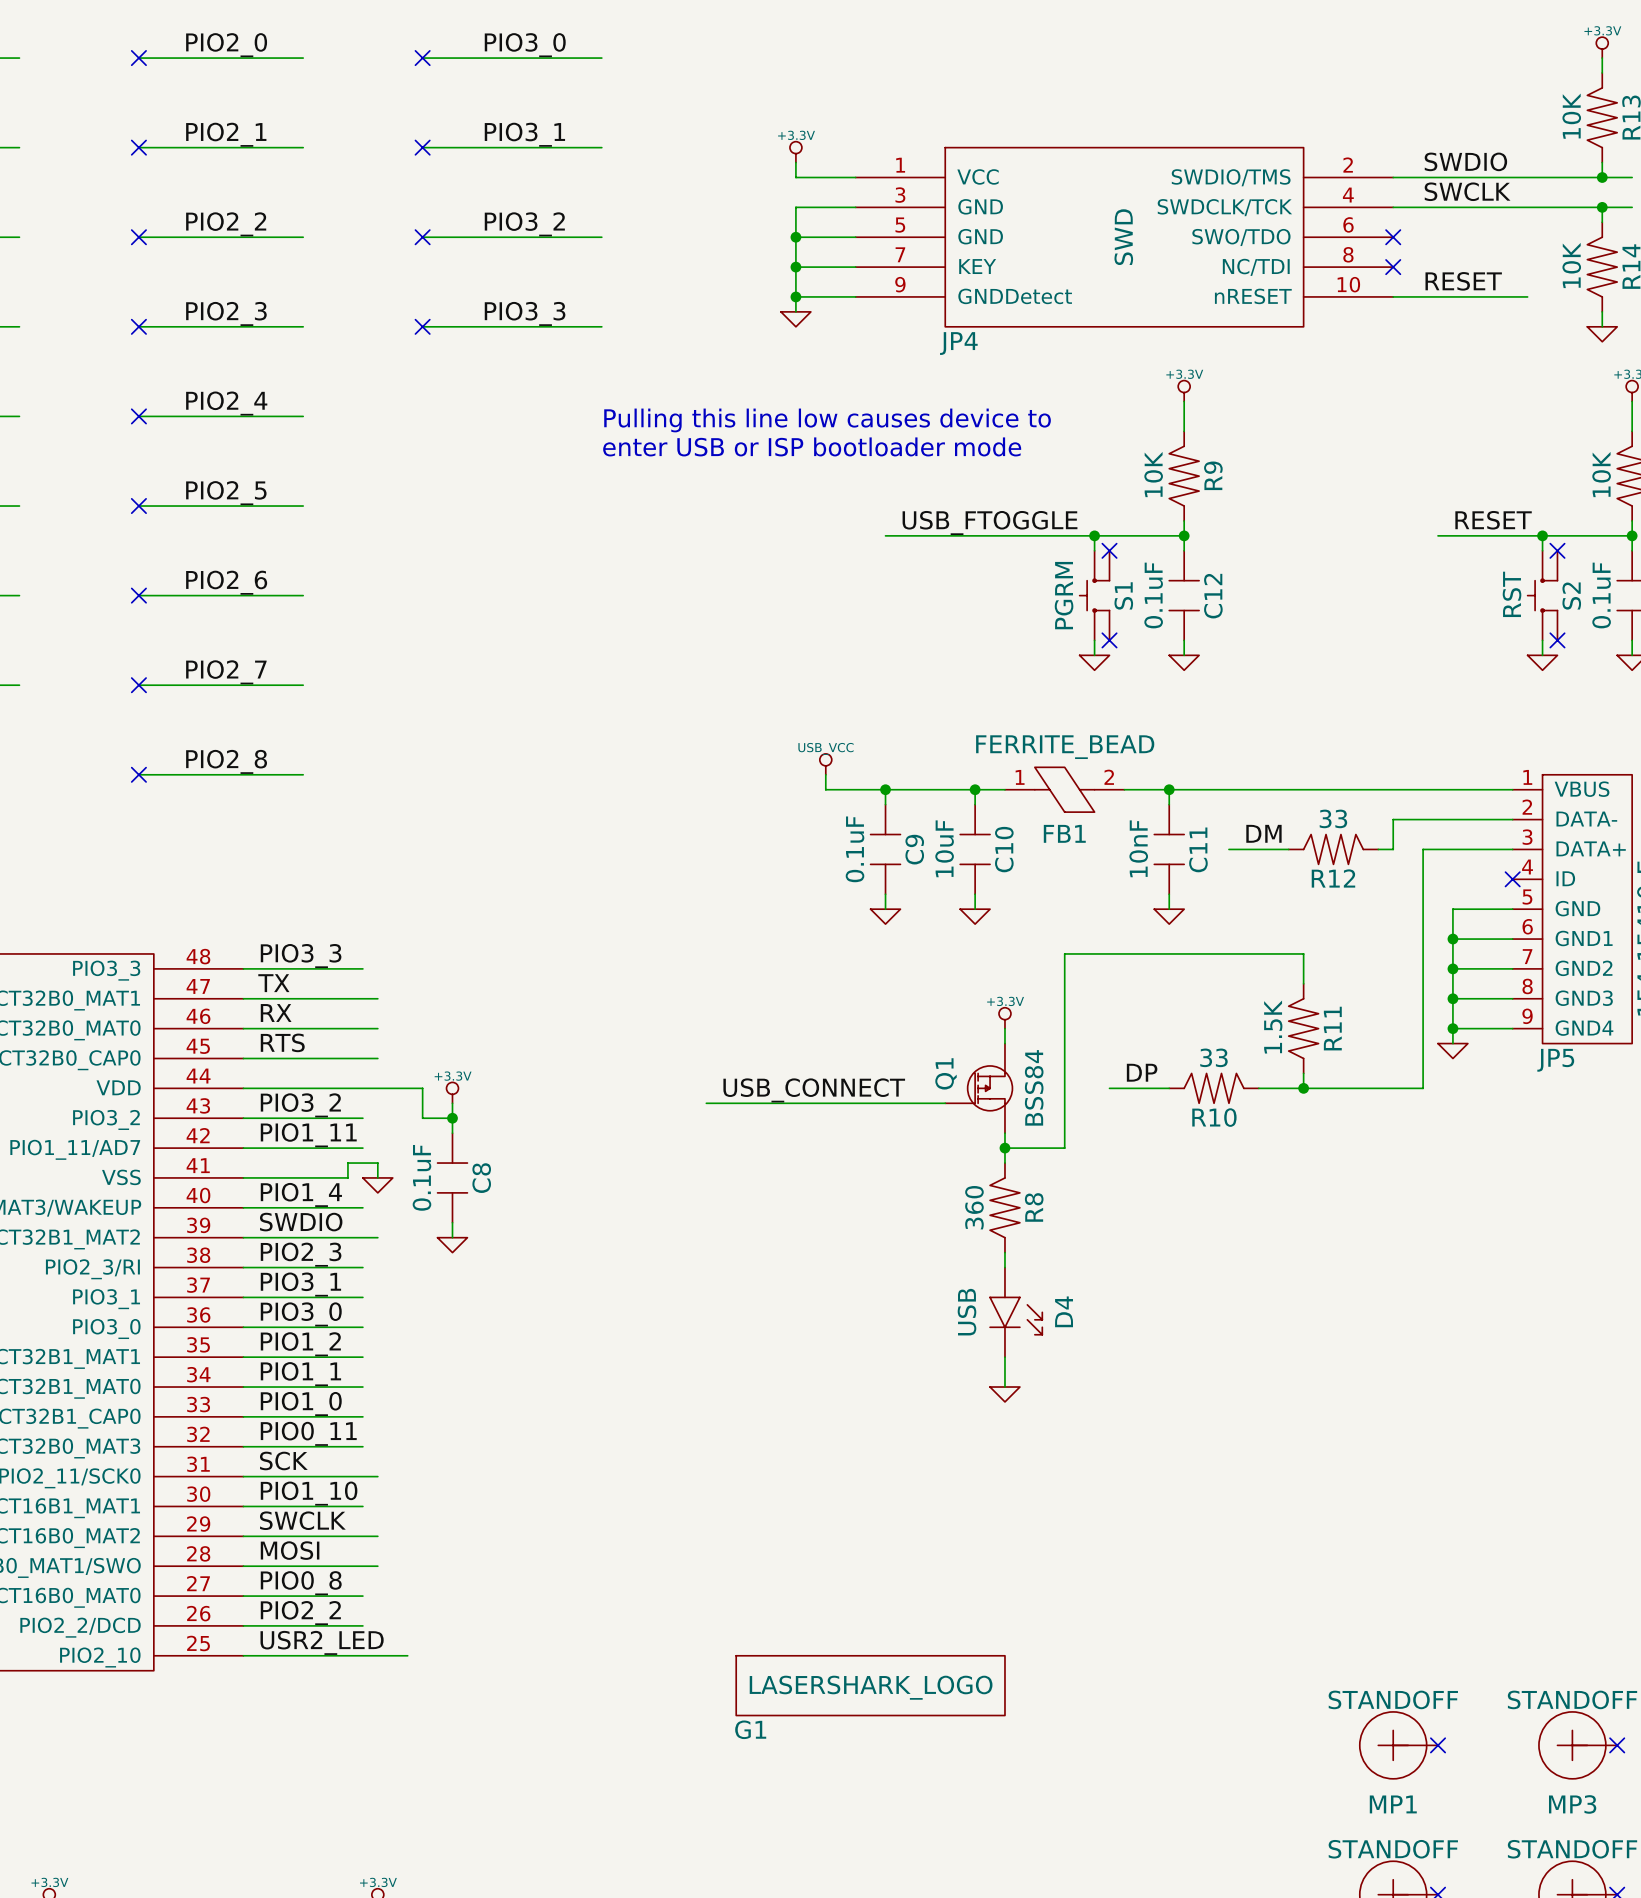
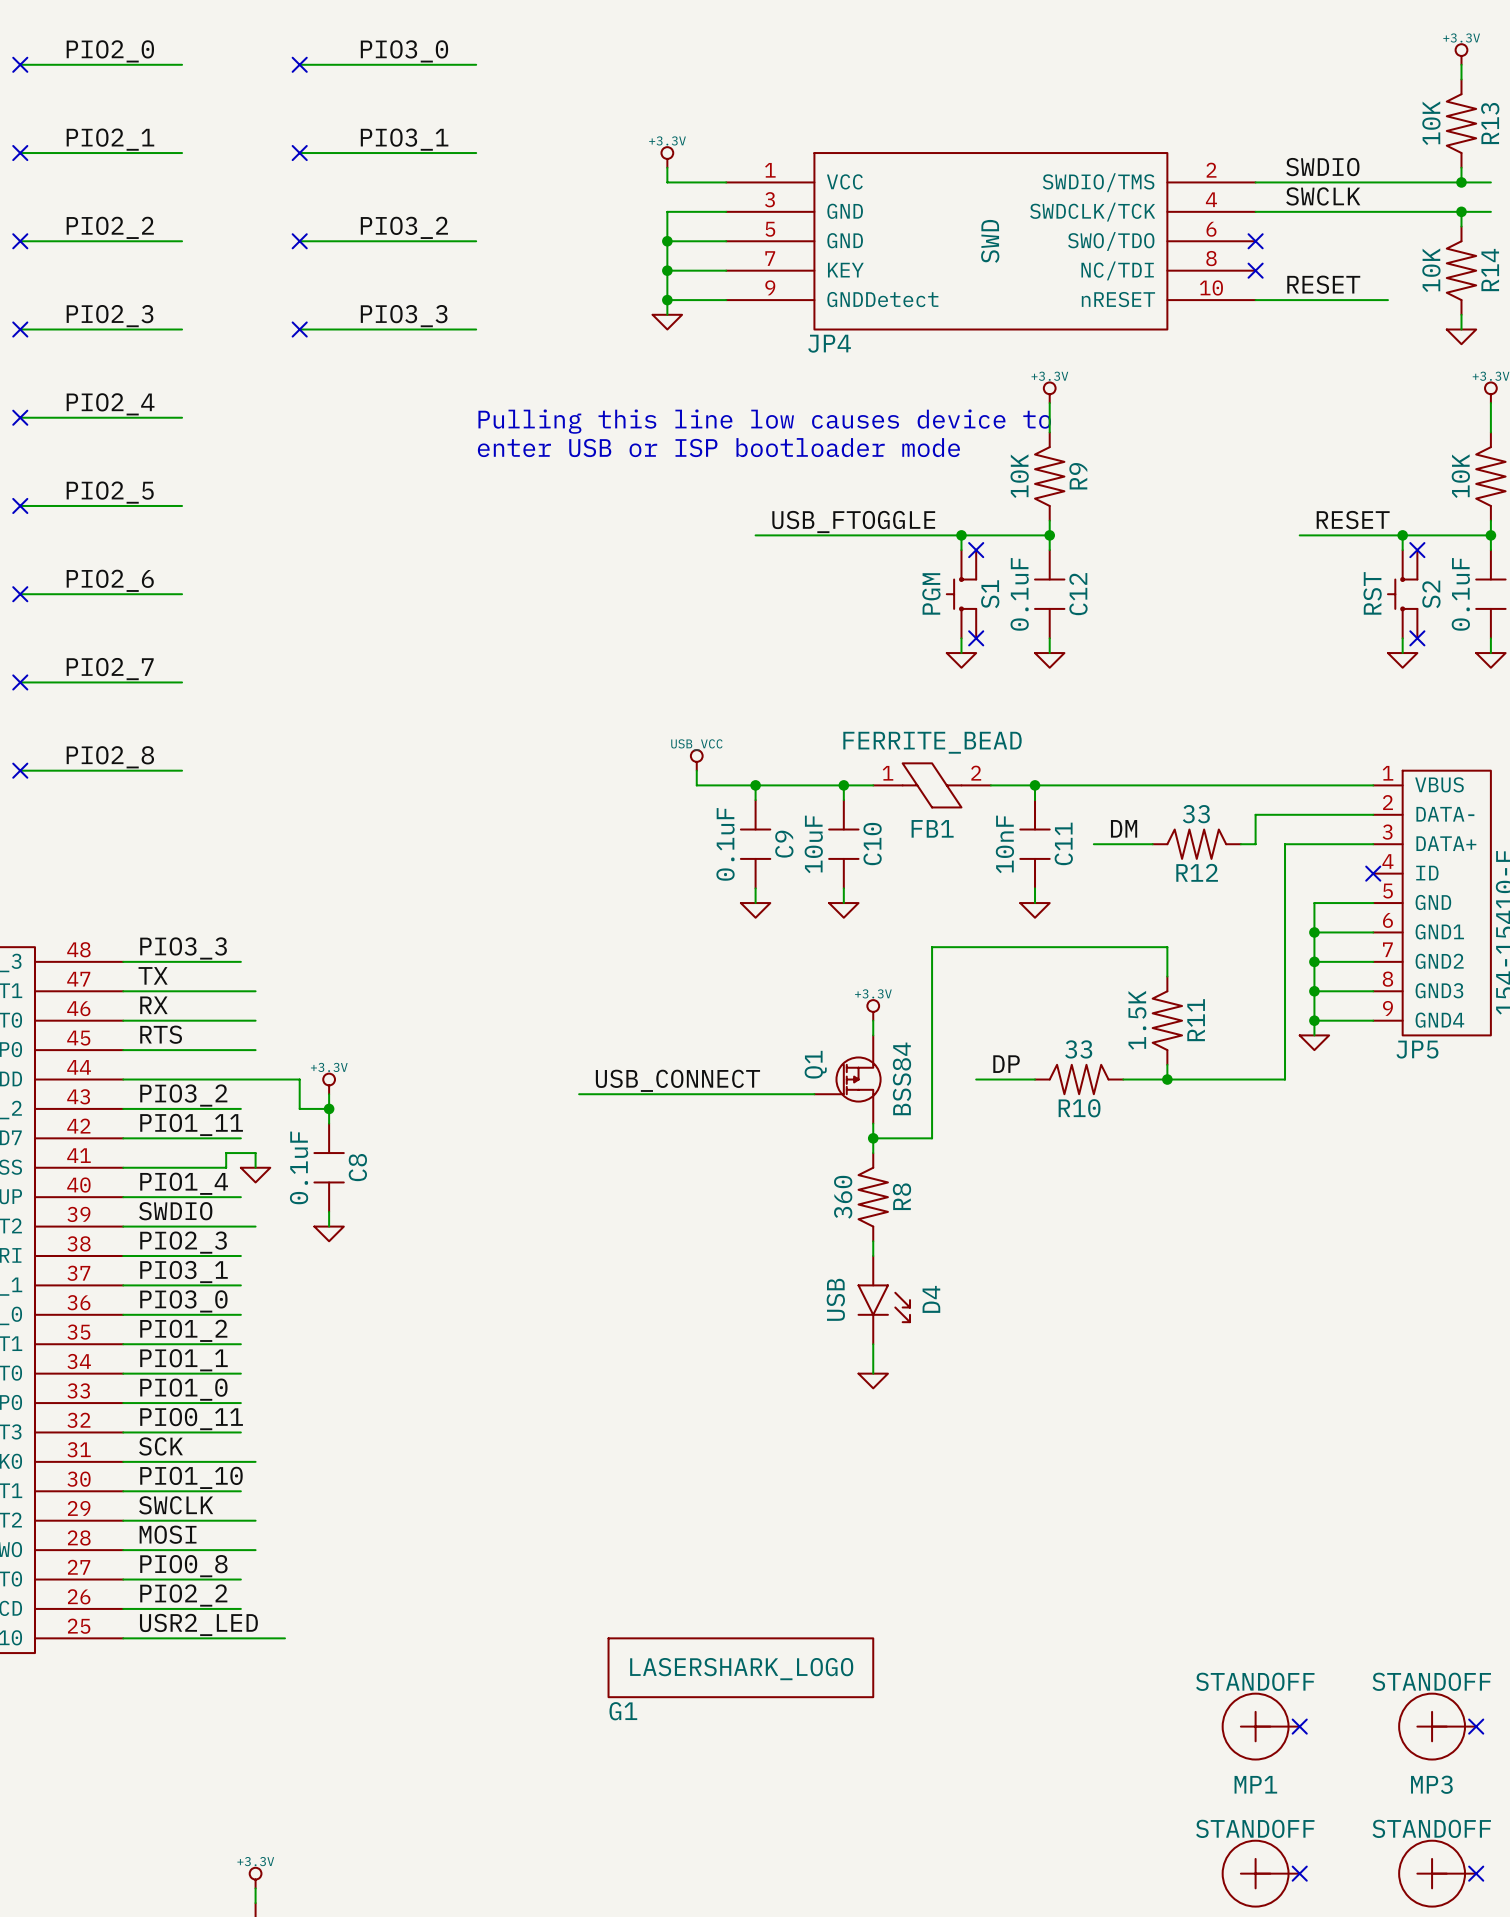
S1 value: PGRM (1064, 595) -> PGM (931, 593)

